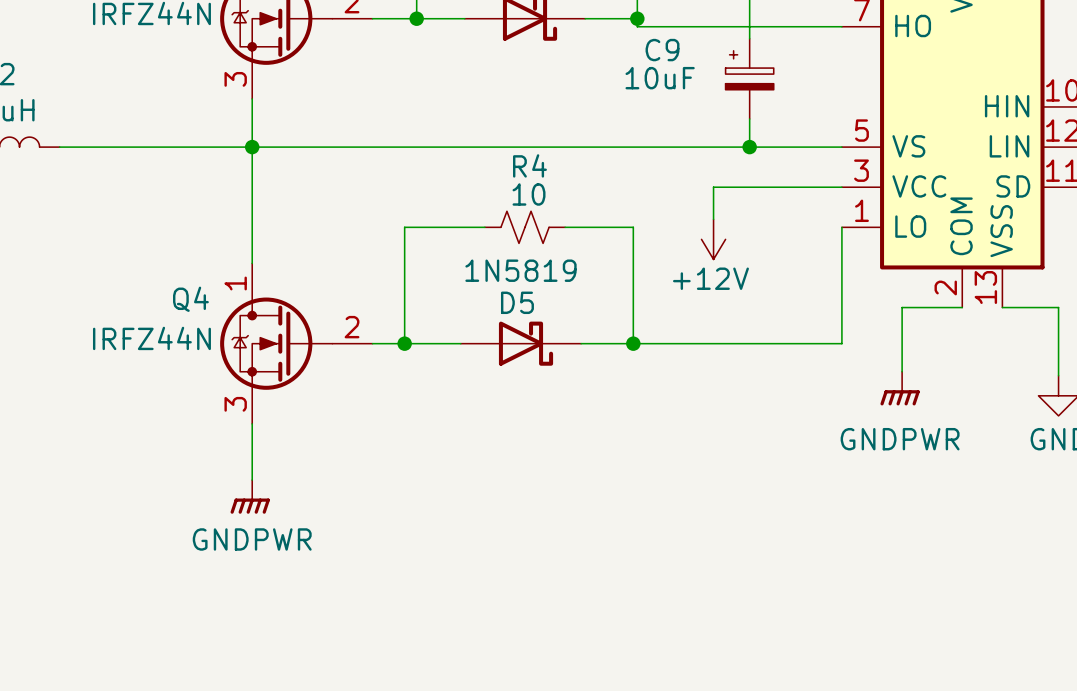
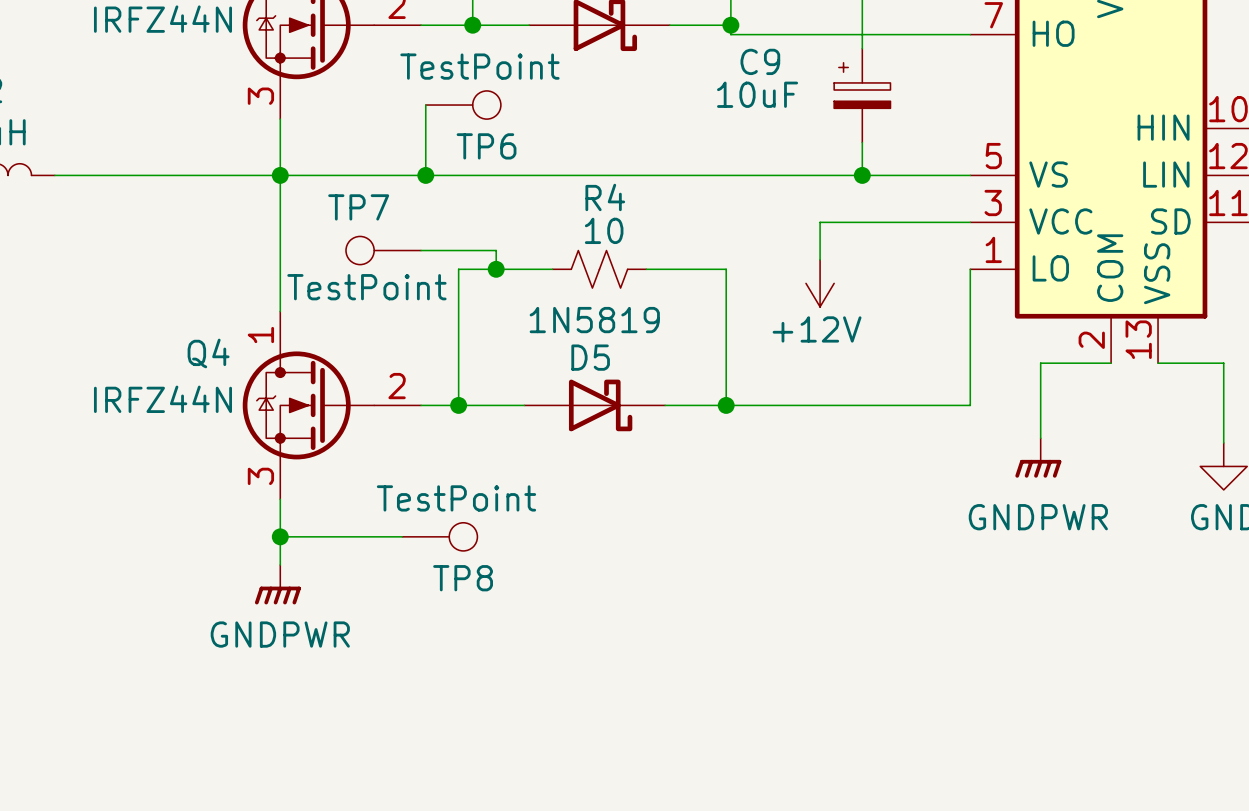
wire: none -> (425, 105) (425, 175)
TP6: none -> TestPoint (463, 105)
junction: none -> (425, 175)
TP7: none -> TestPoint (383, 250)
wire: none -> (421, 250) (496, 250) (496, 269)
junction: none -> (496, 269)
wire: none -> (280, 536) (402, 536)
junction: none -> (280, 536)
TP8: none -> TestPoint (439, 536)

